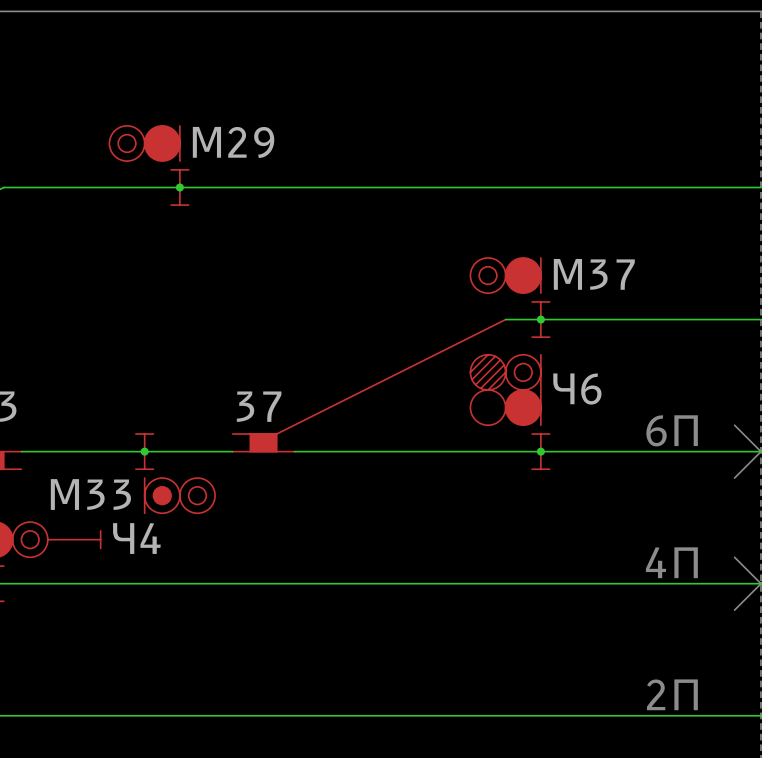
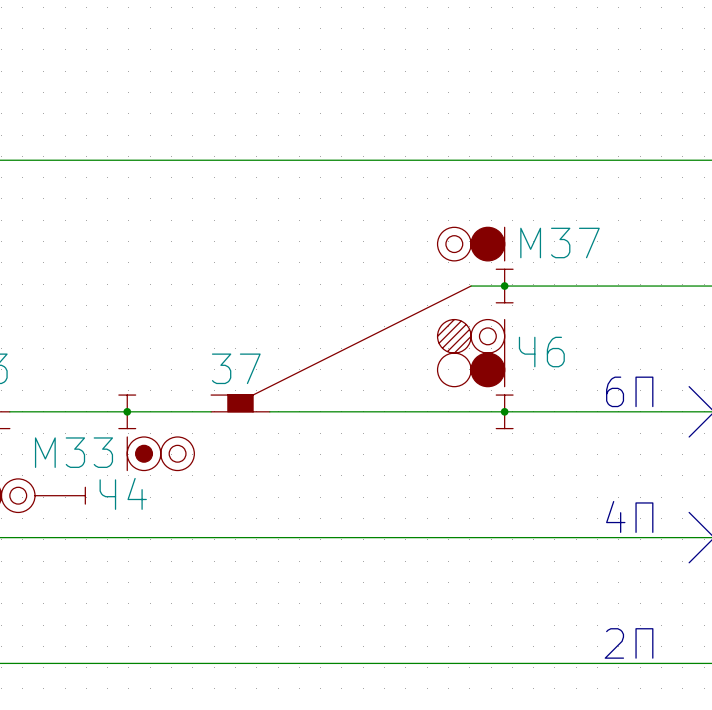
part: (144, 143) -> none
junction: (179, 187) -> none
part: (179, 187) -> none

